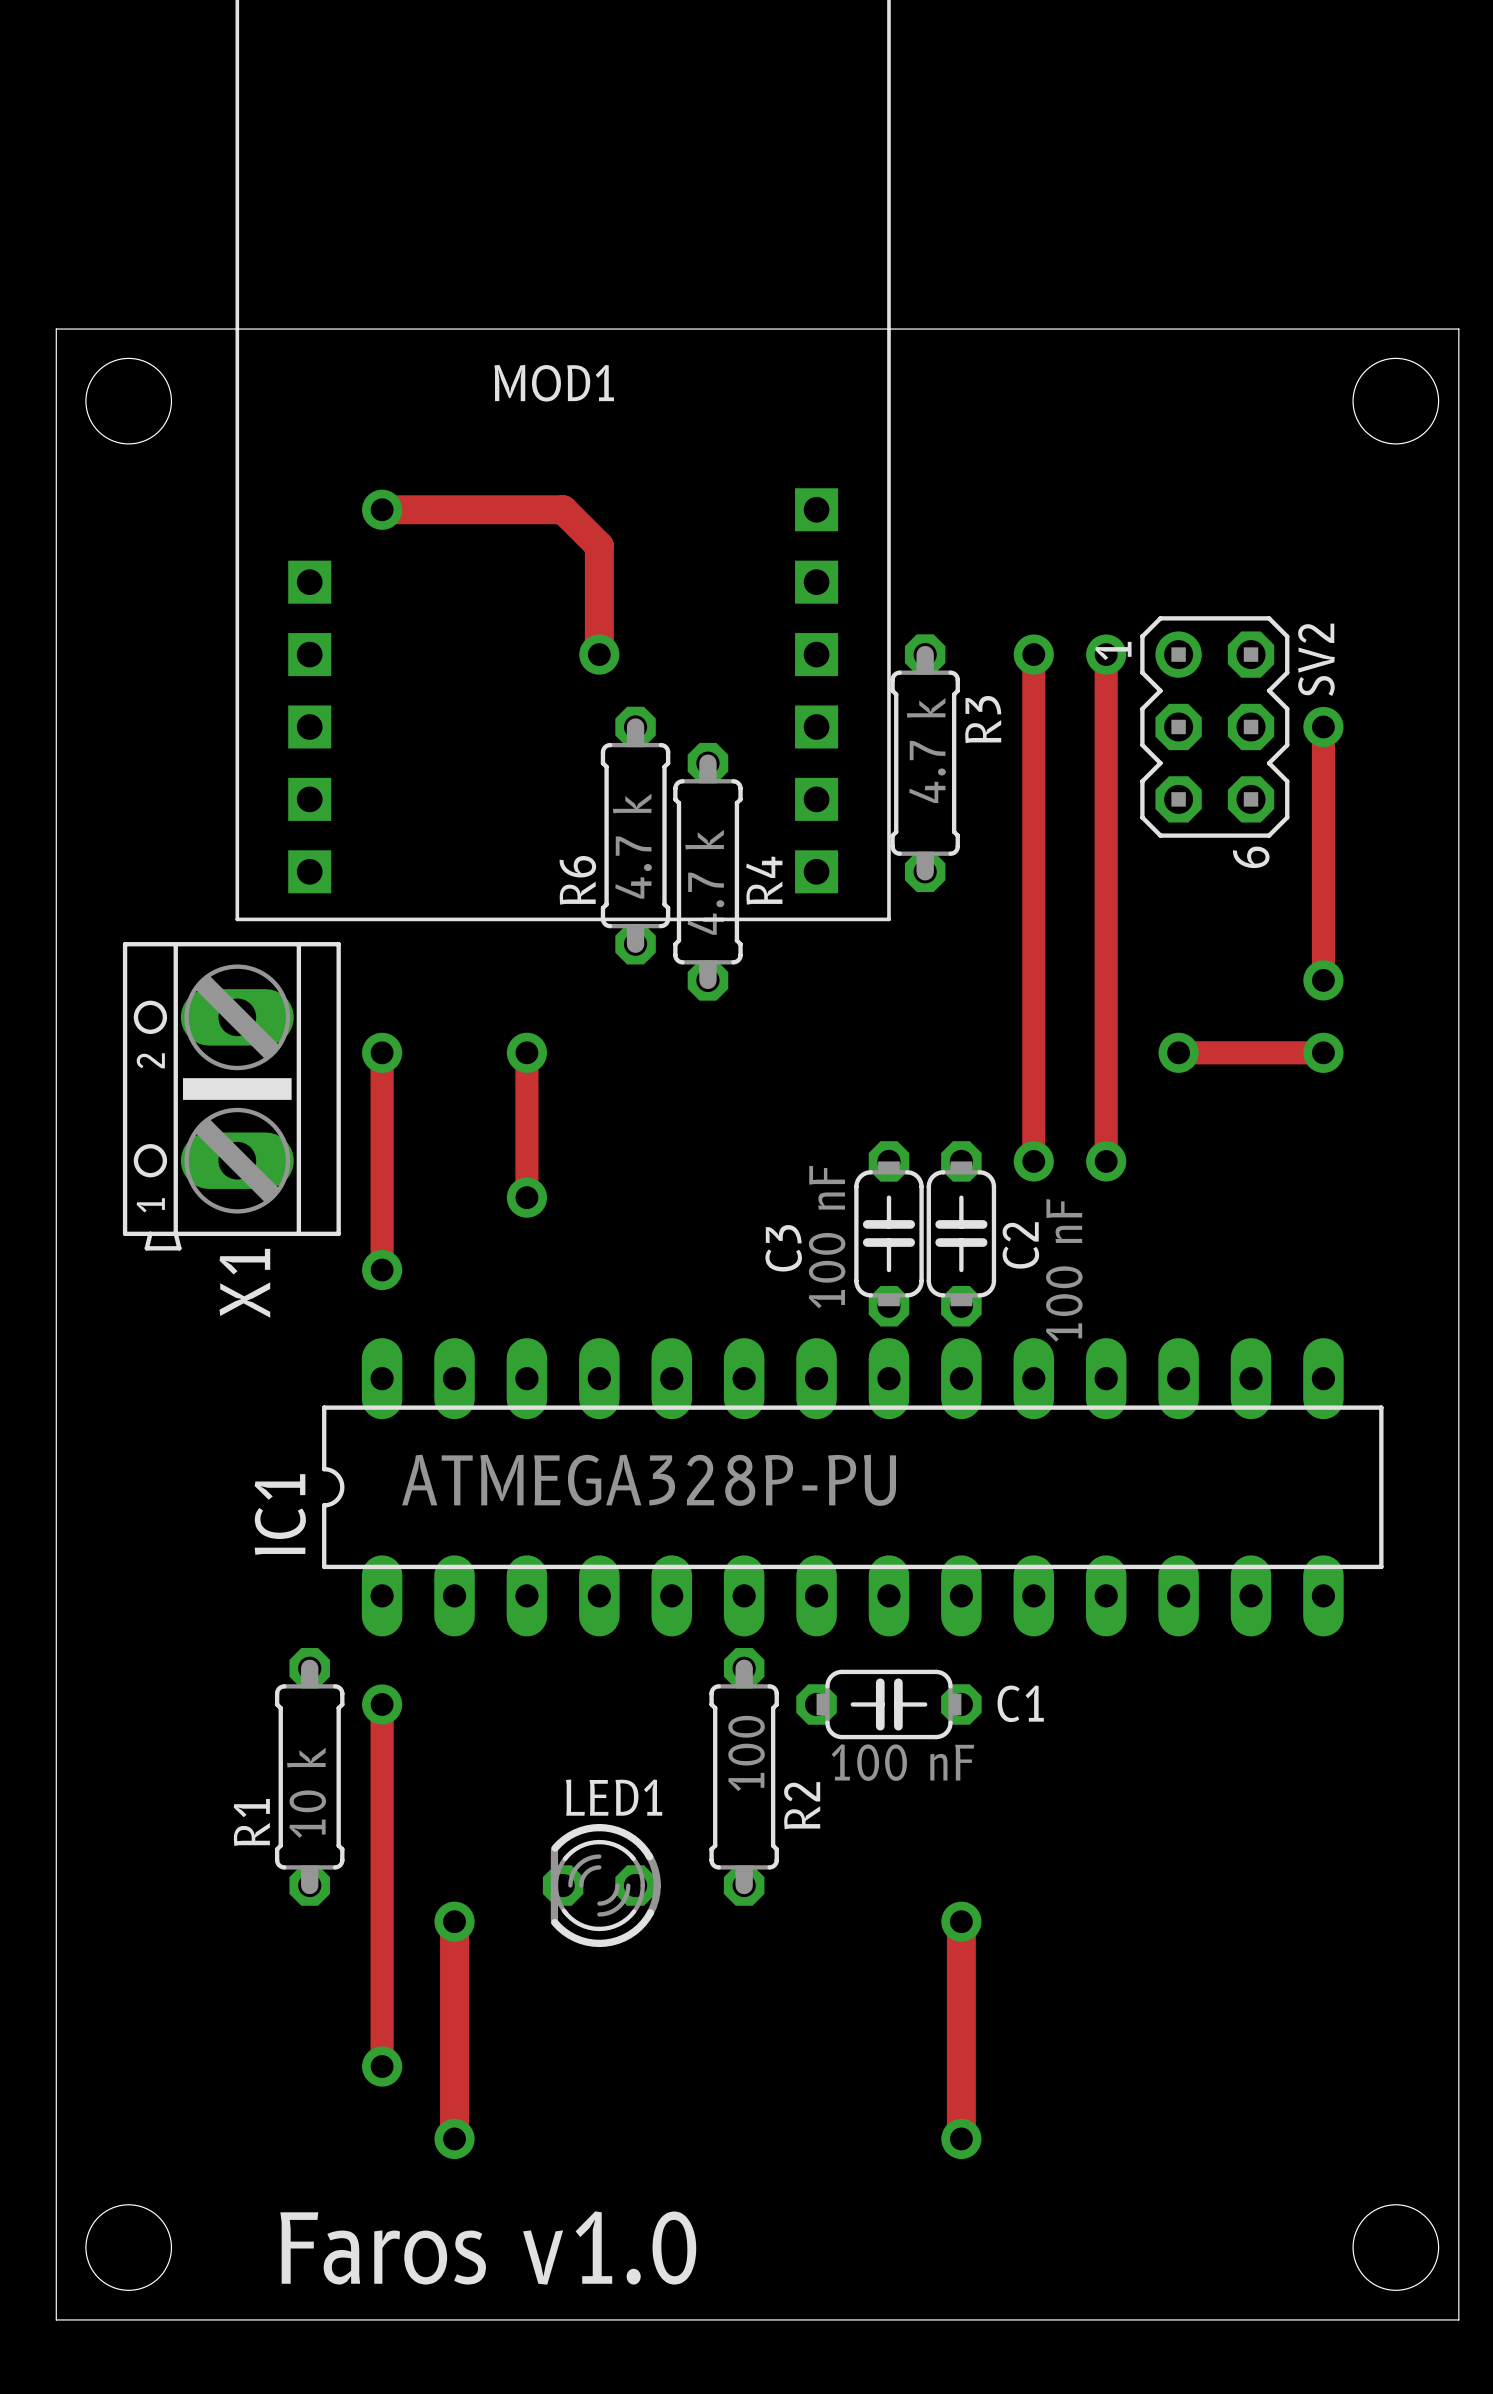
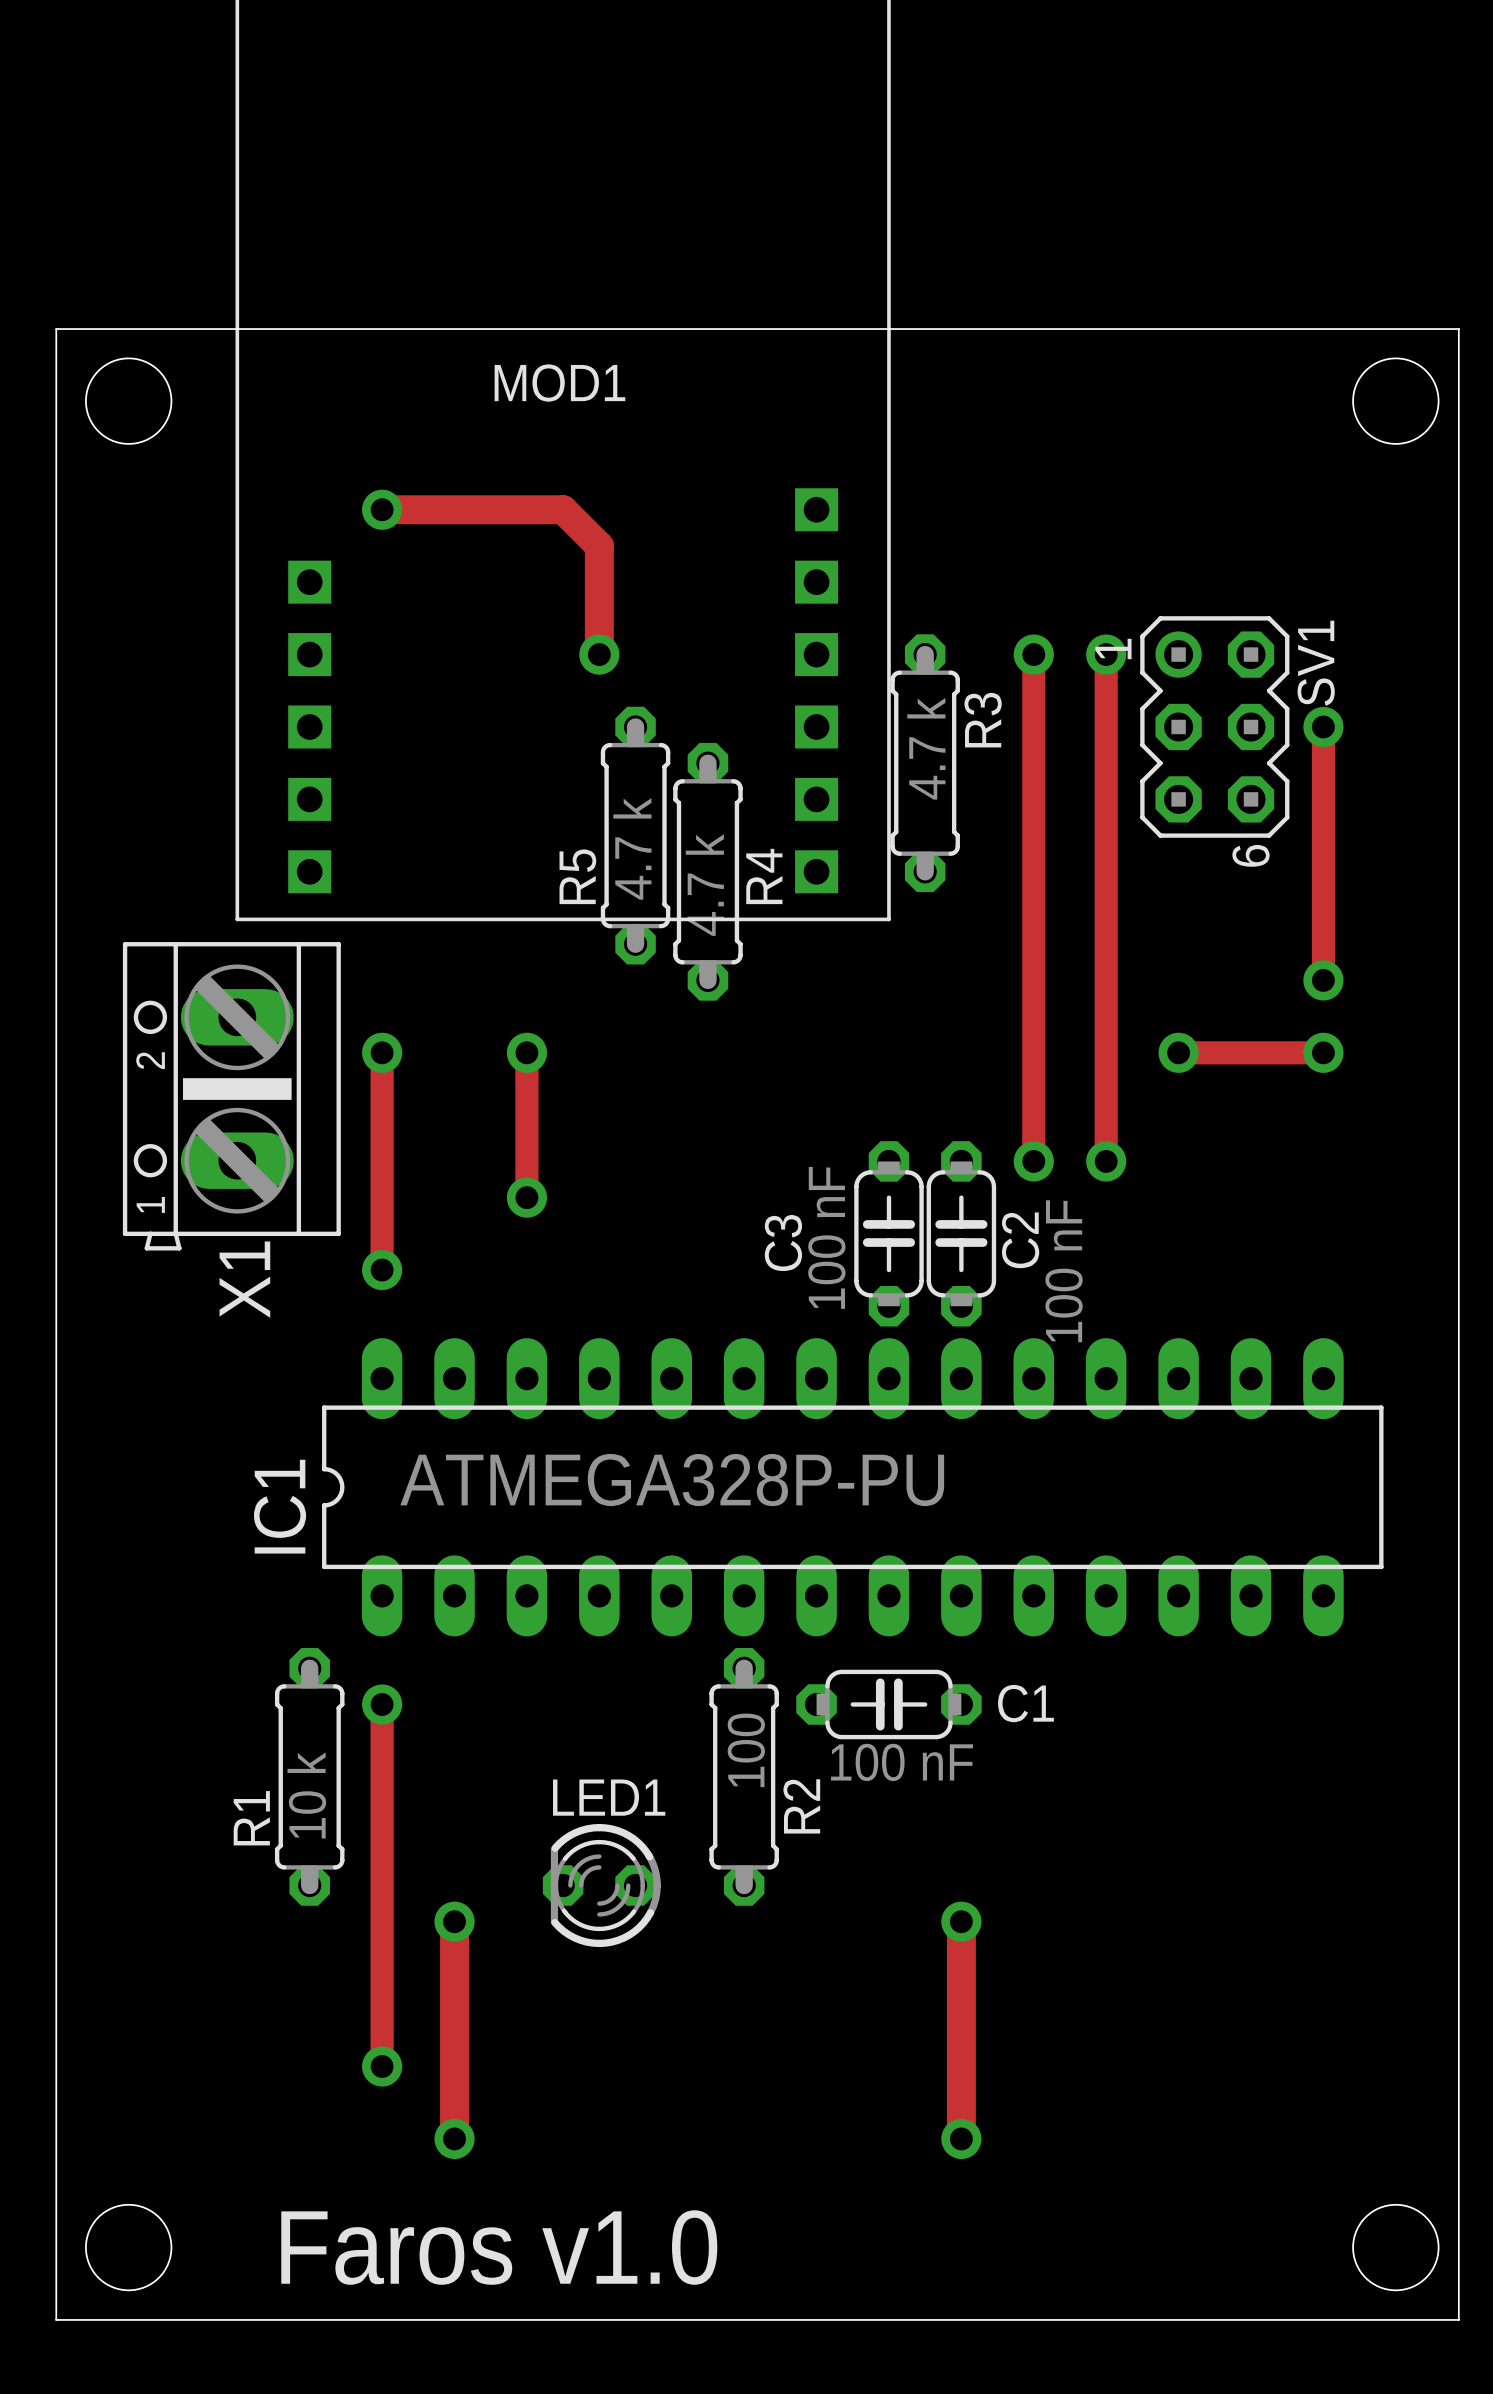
SV2 name: SV2 (1316, 659) -> SV1 (1316, 663)
R6 name: R6 (577, 880) -> R5 (577, 876)

